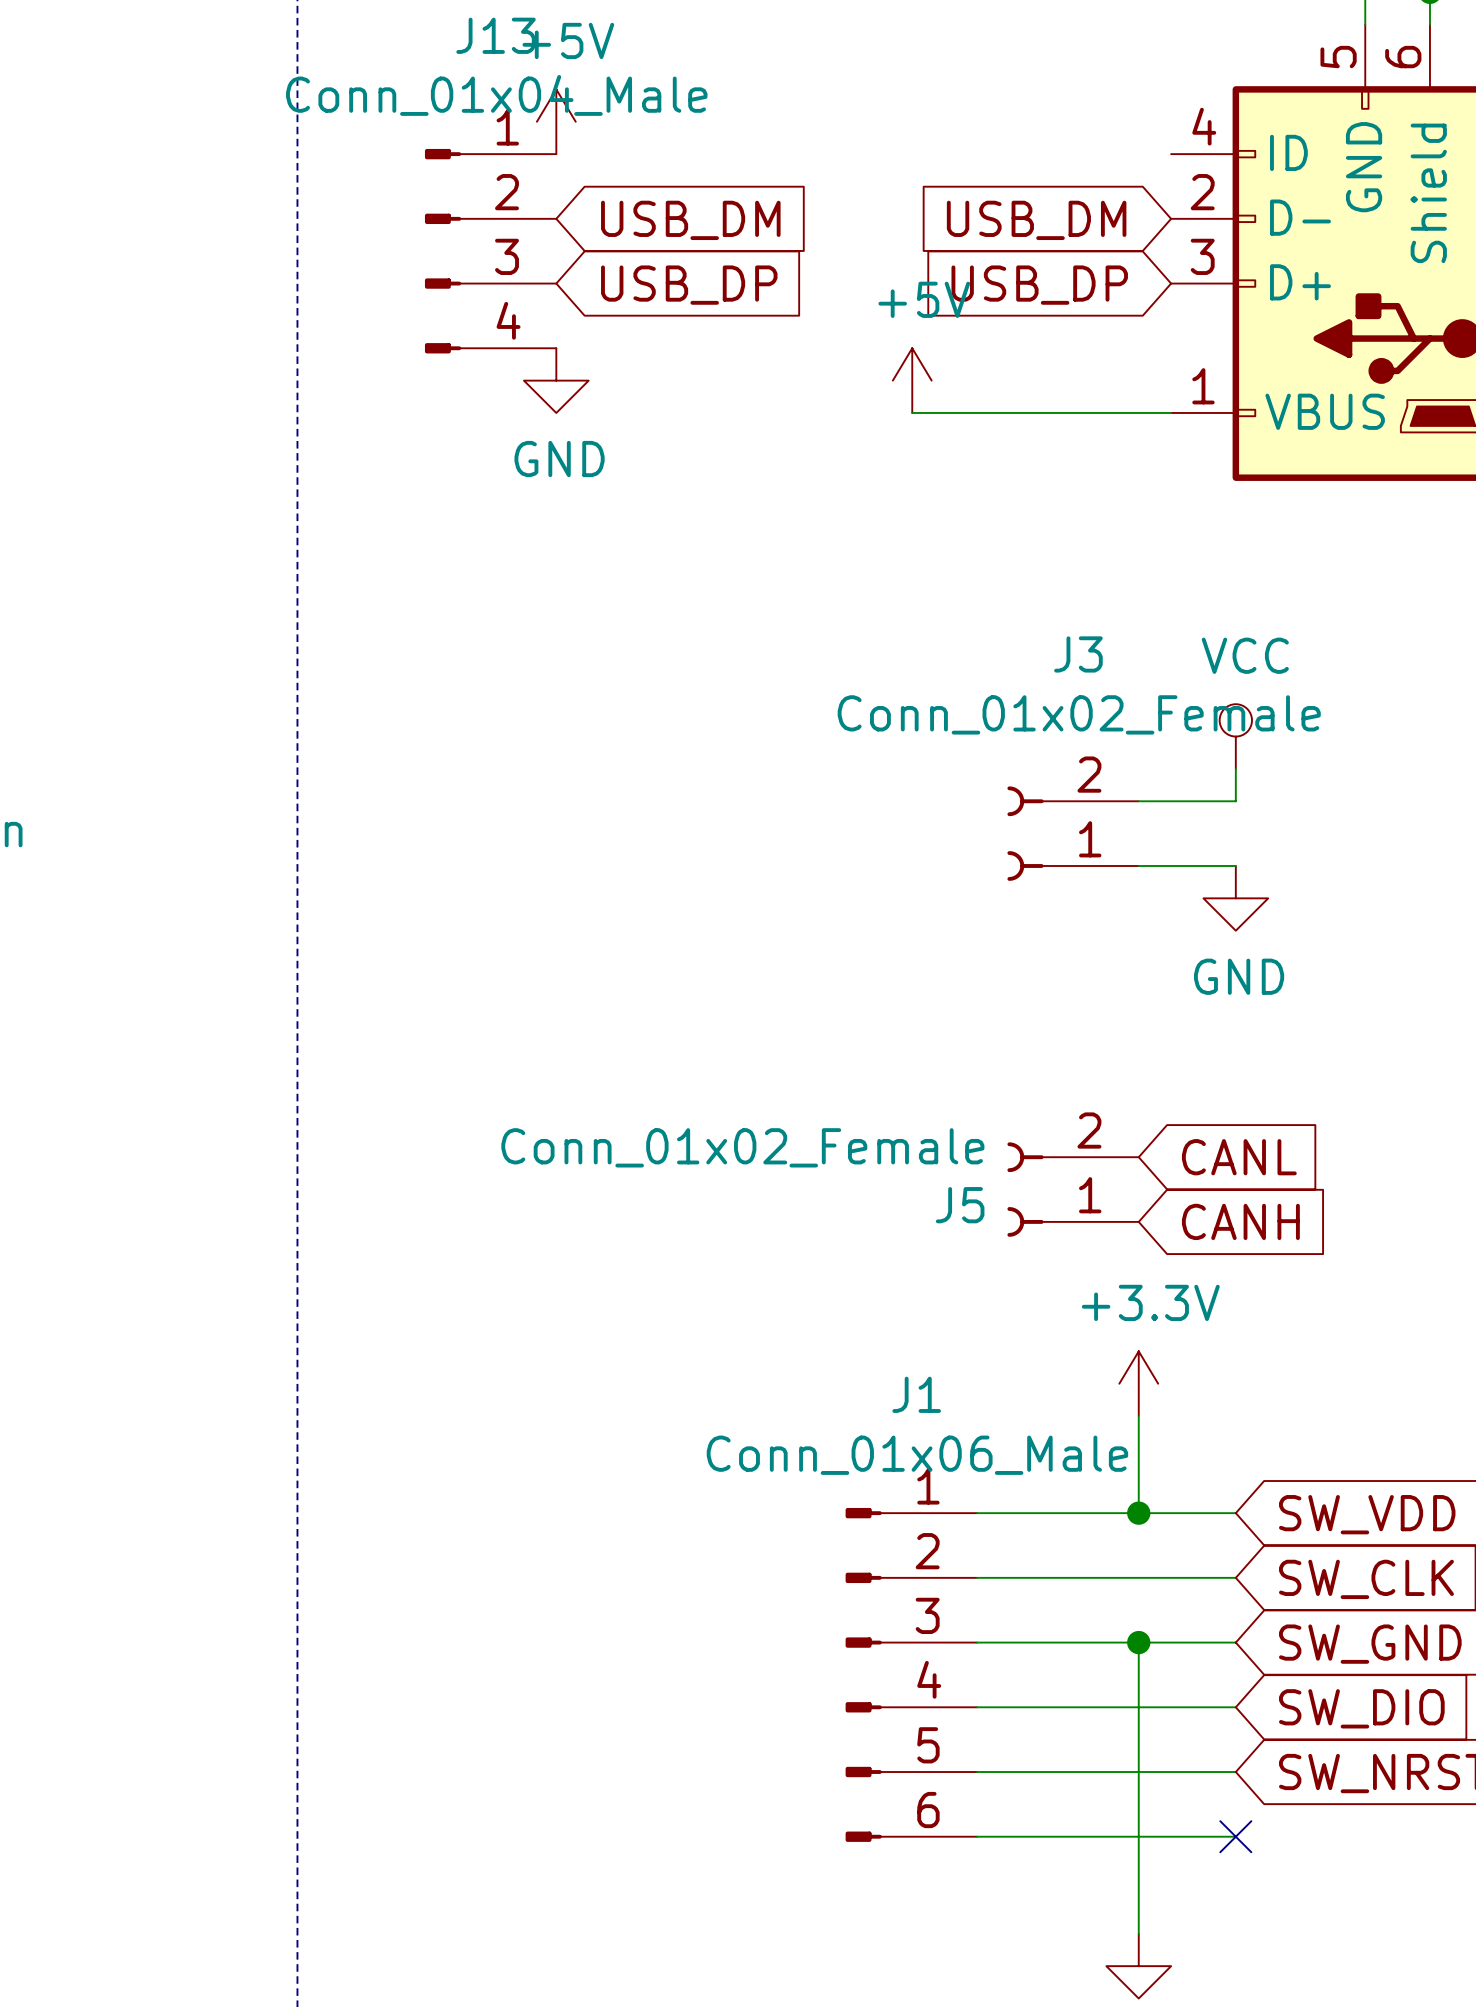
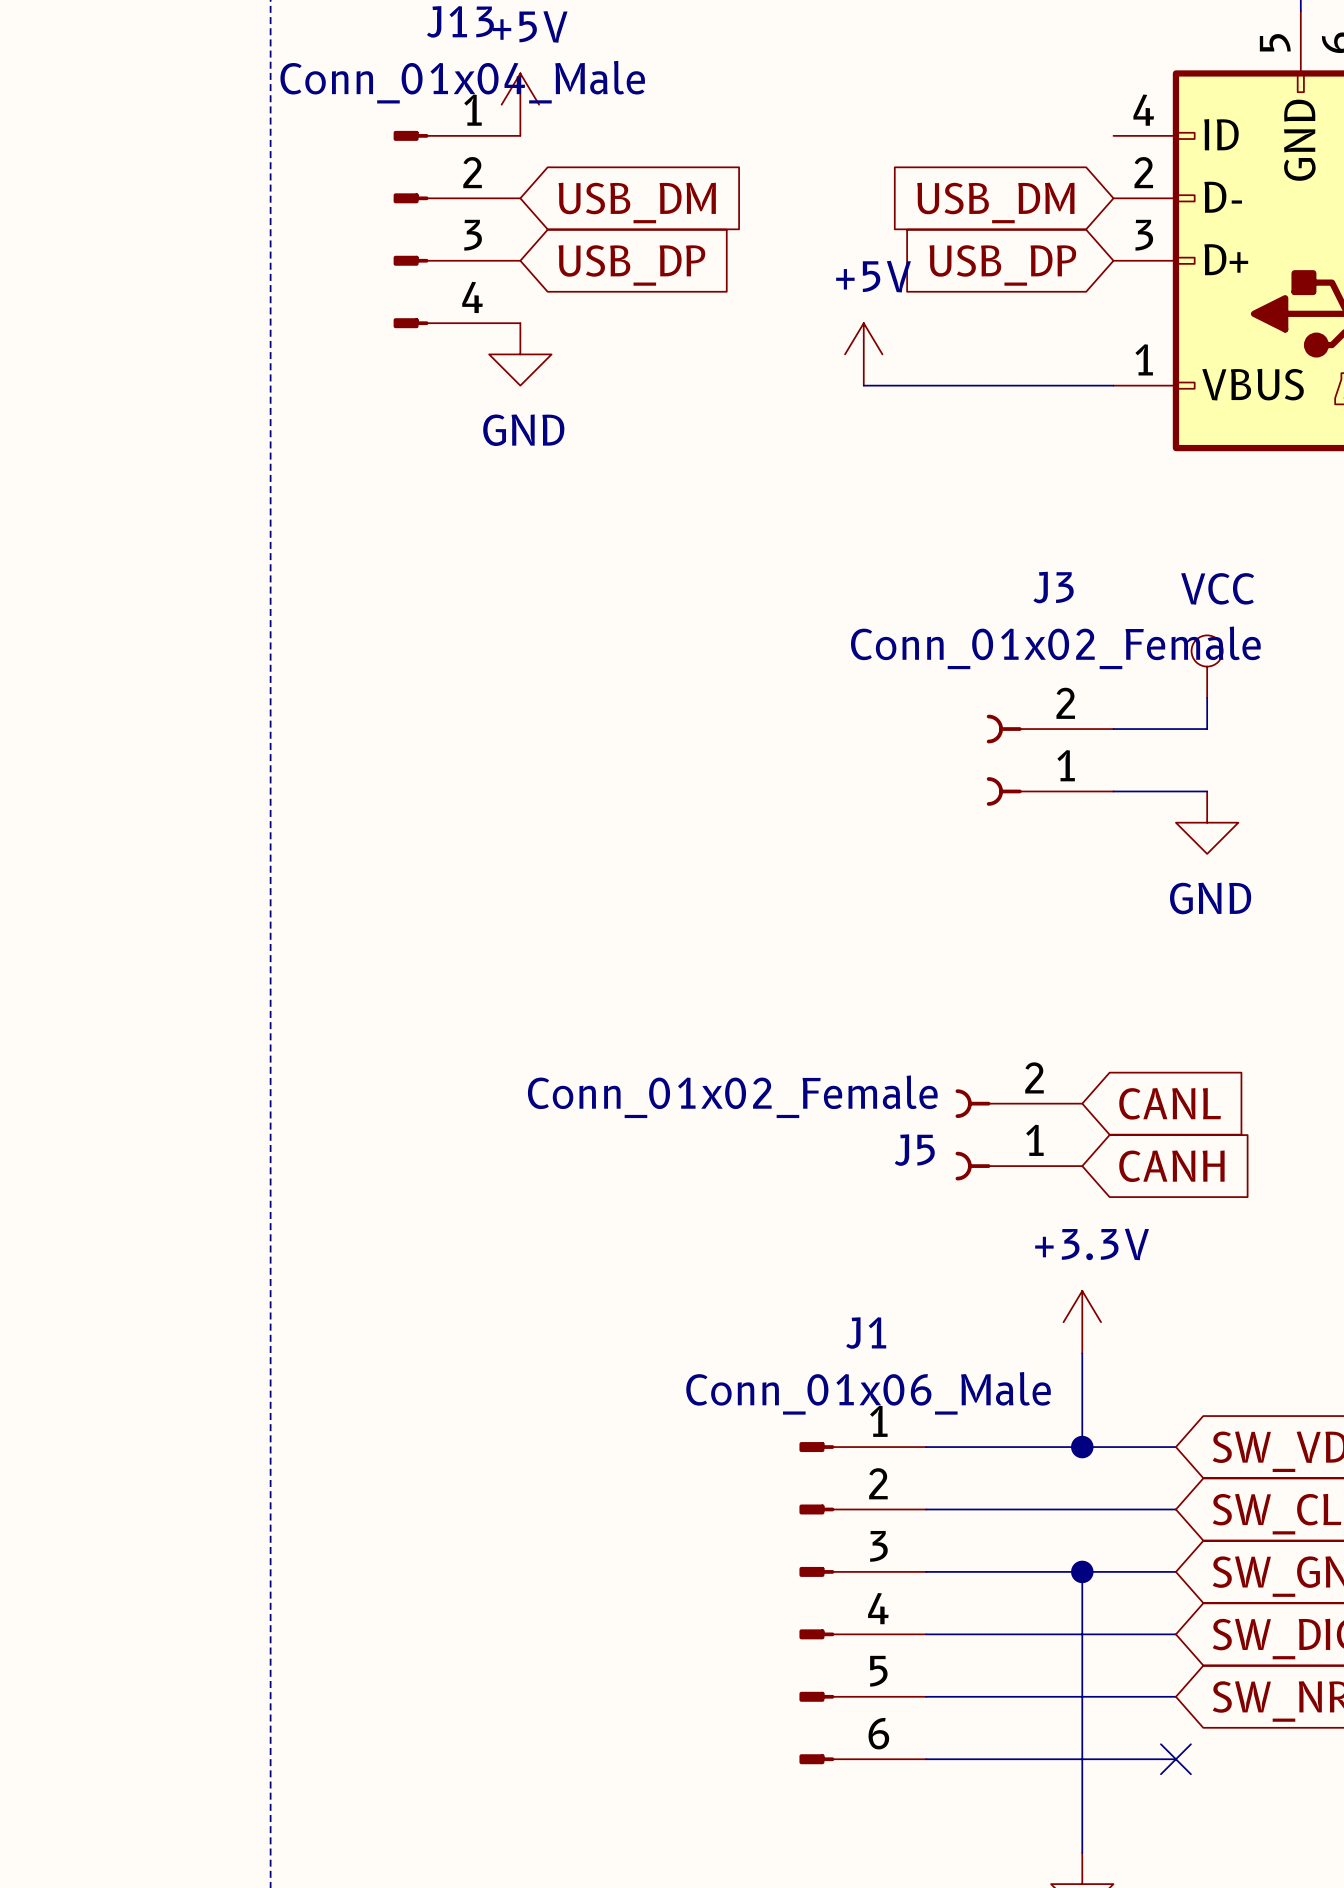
power symbol position: VCC (1235, 736) -> VCC (1207, 666)
wire: (1235, 768) (1235, 801) (1138, 801) -> (1207, 697) (1207, 729) (1113, 729)
J3 position: (1073, 833) -> (1050, 760)
wire: (1138, 865) (1235, 865) -> (1113, 791) (1207, 791)
power symbol position: GND (1235, 898) -> GND (1207, 822)

